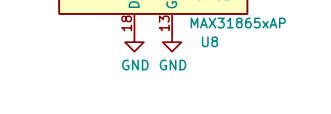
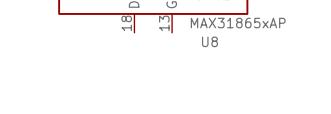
power symbol: GND (134, 42) -> none
power symbol: GND (172, 42) -> none

